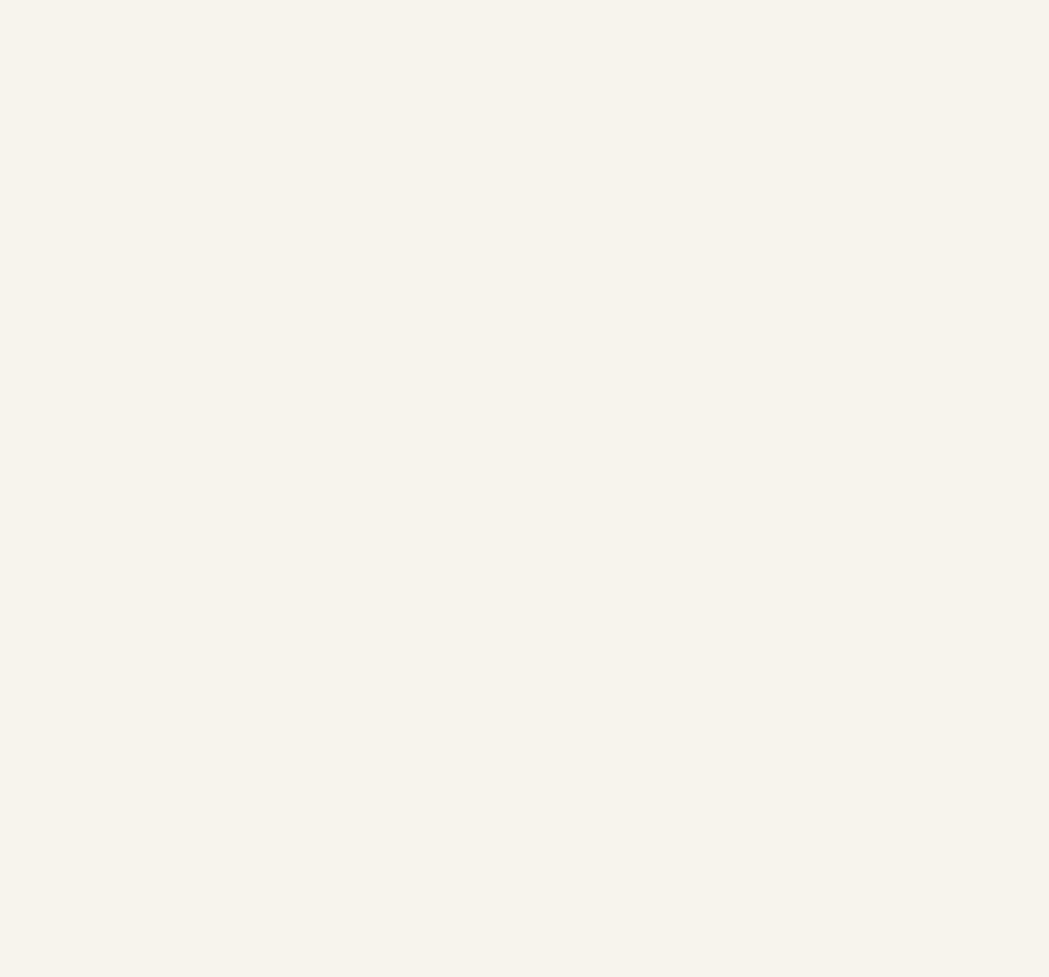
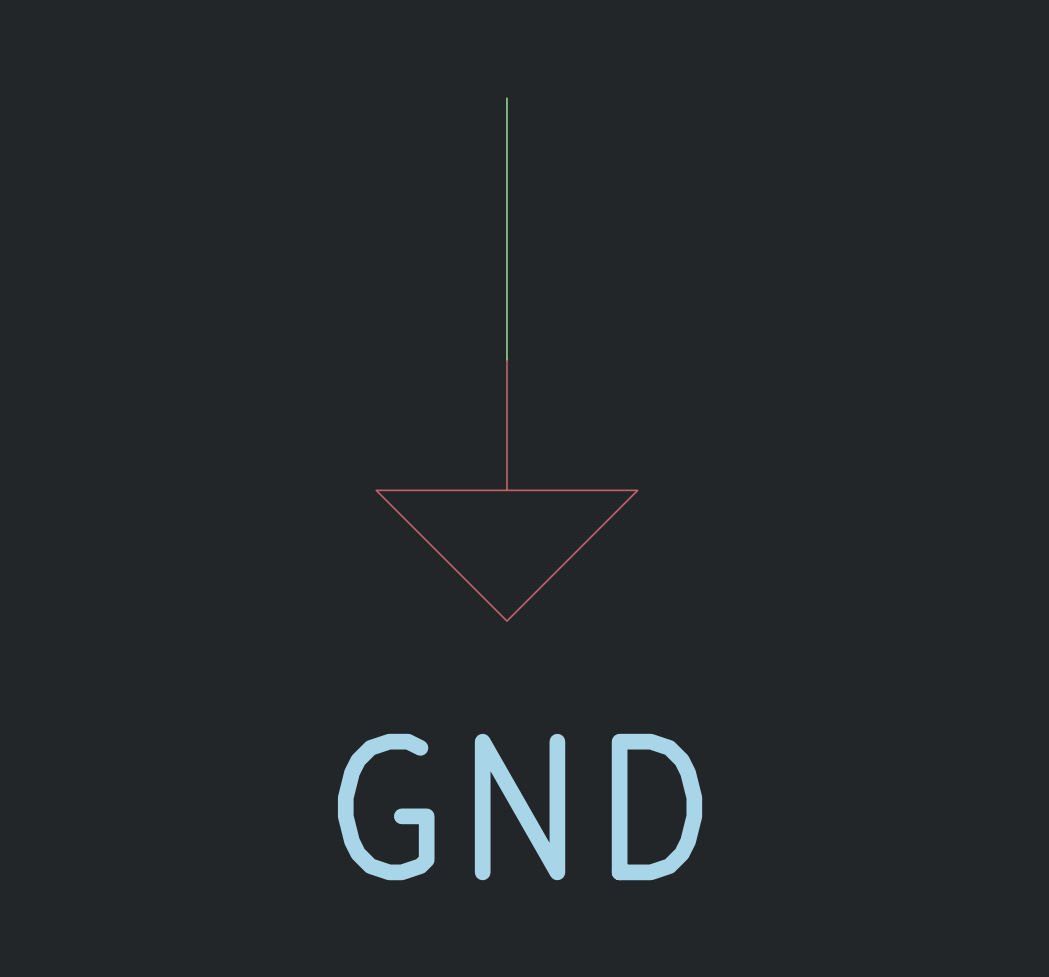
wire: none -> (506, 98) (506, 359)
power symbol: none -> GND (506, 490)

